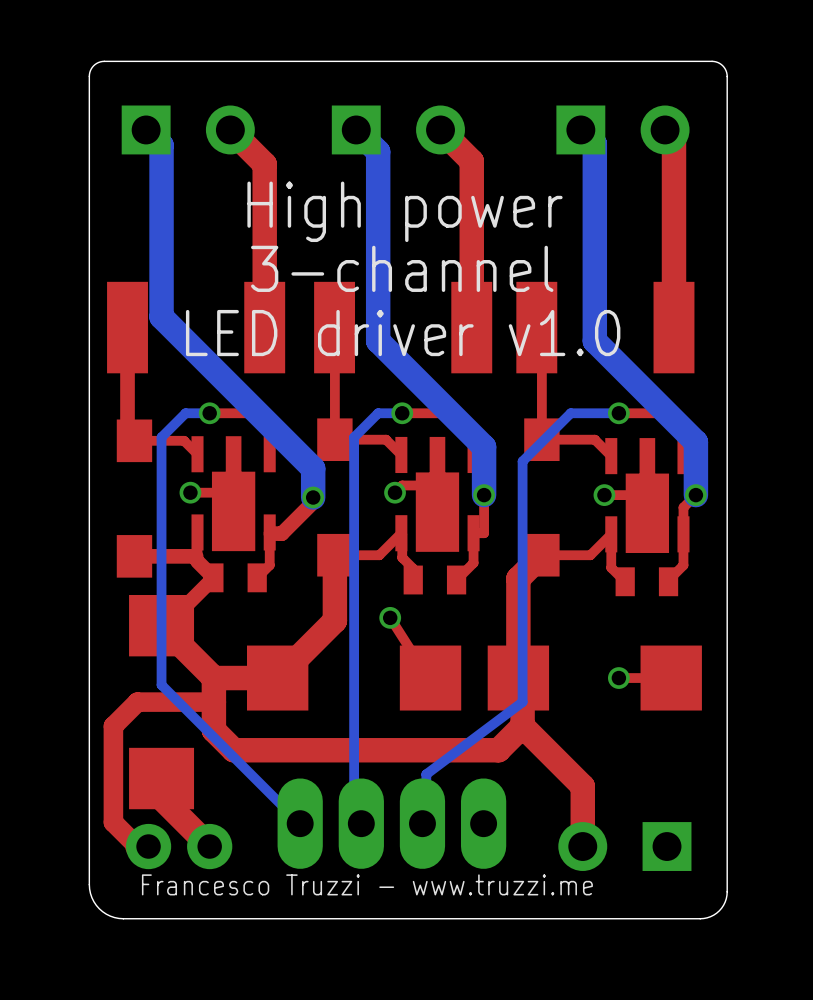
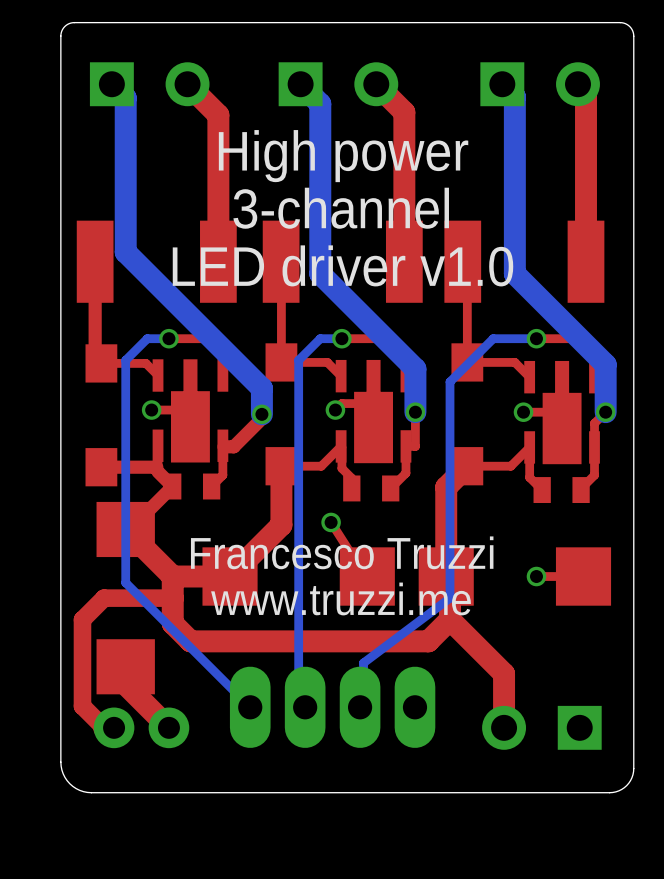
text: none -> Francesco Truzzi (342, 552)
text: none -> www.truzzi.me (340, 598)
text: Francesco Truzzi - www.truzzi.me (367, 884) -> none

